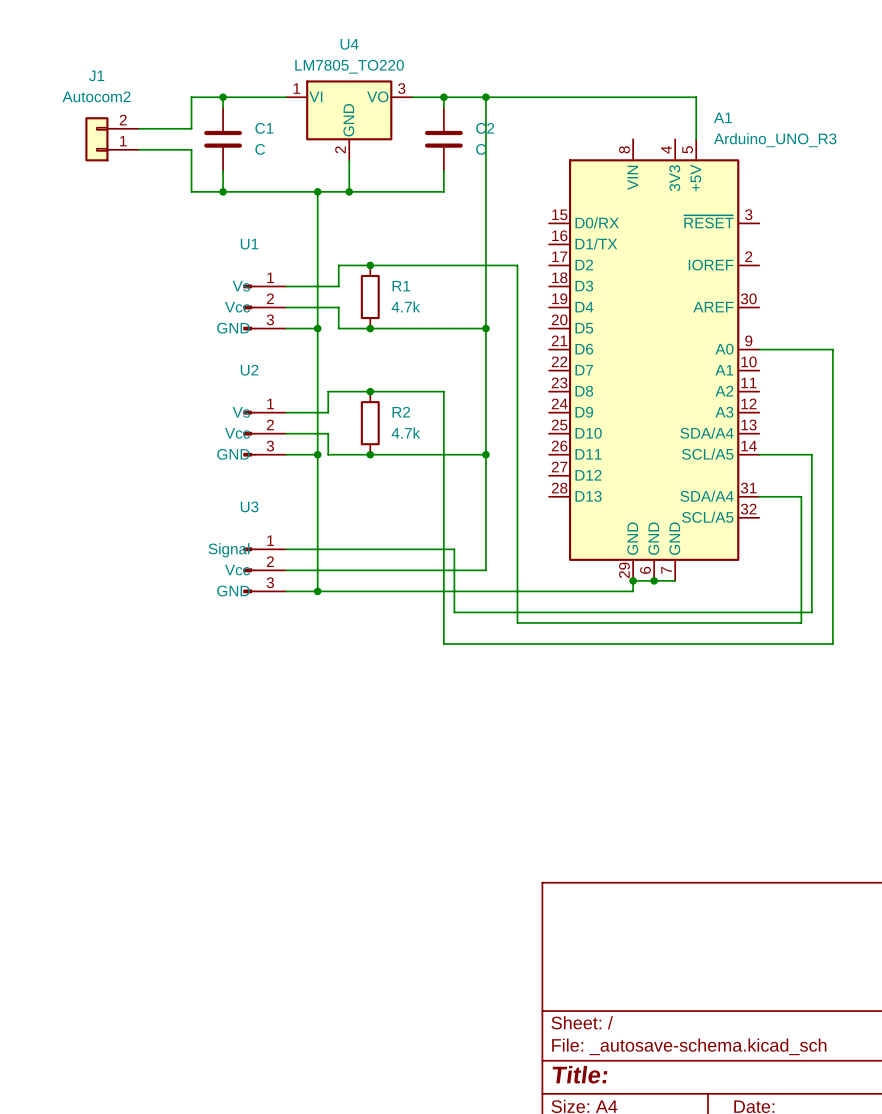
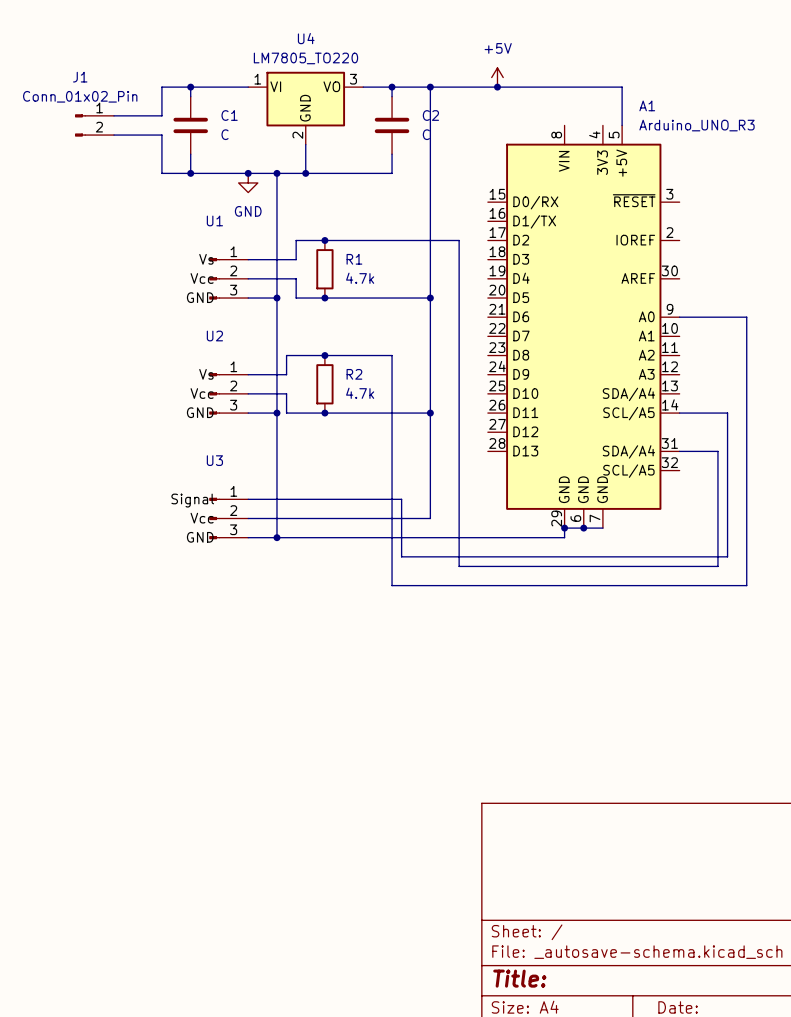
power symbol: none -> +5V (497, 77)
J1 value: Autocom2 (96, 96) -> Conn_01x02_Pin (80, 96)
junction: none -> (497, 87)
J1 symbol: [85, 117, 139, 162] -> [75, 114, 115, 137]
junction: none -> (248, 173)
power symbol: none -> GND (248, 182)

